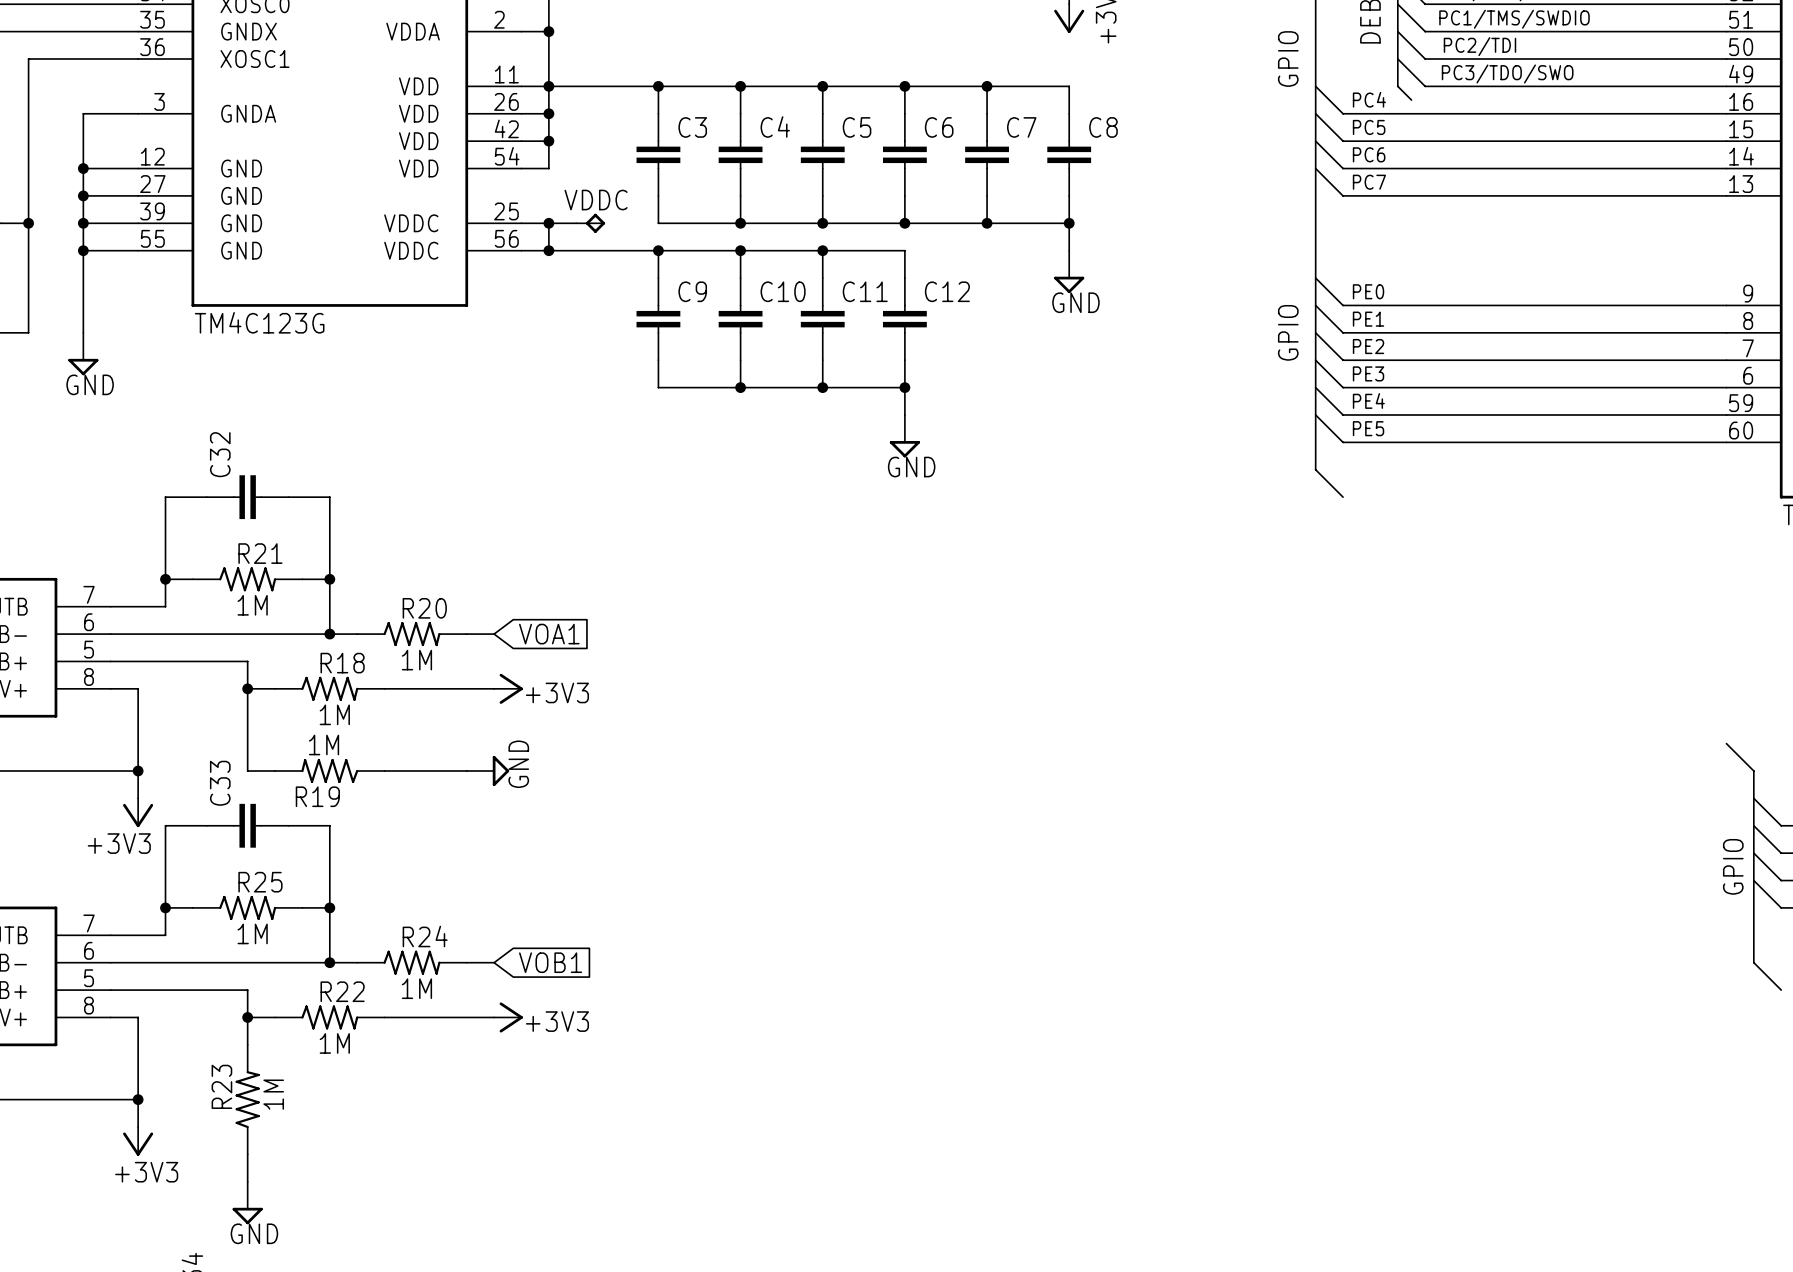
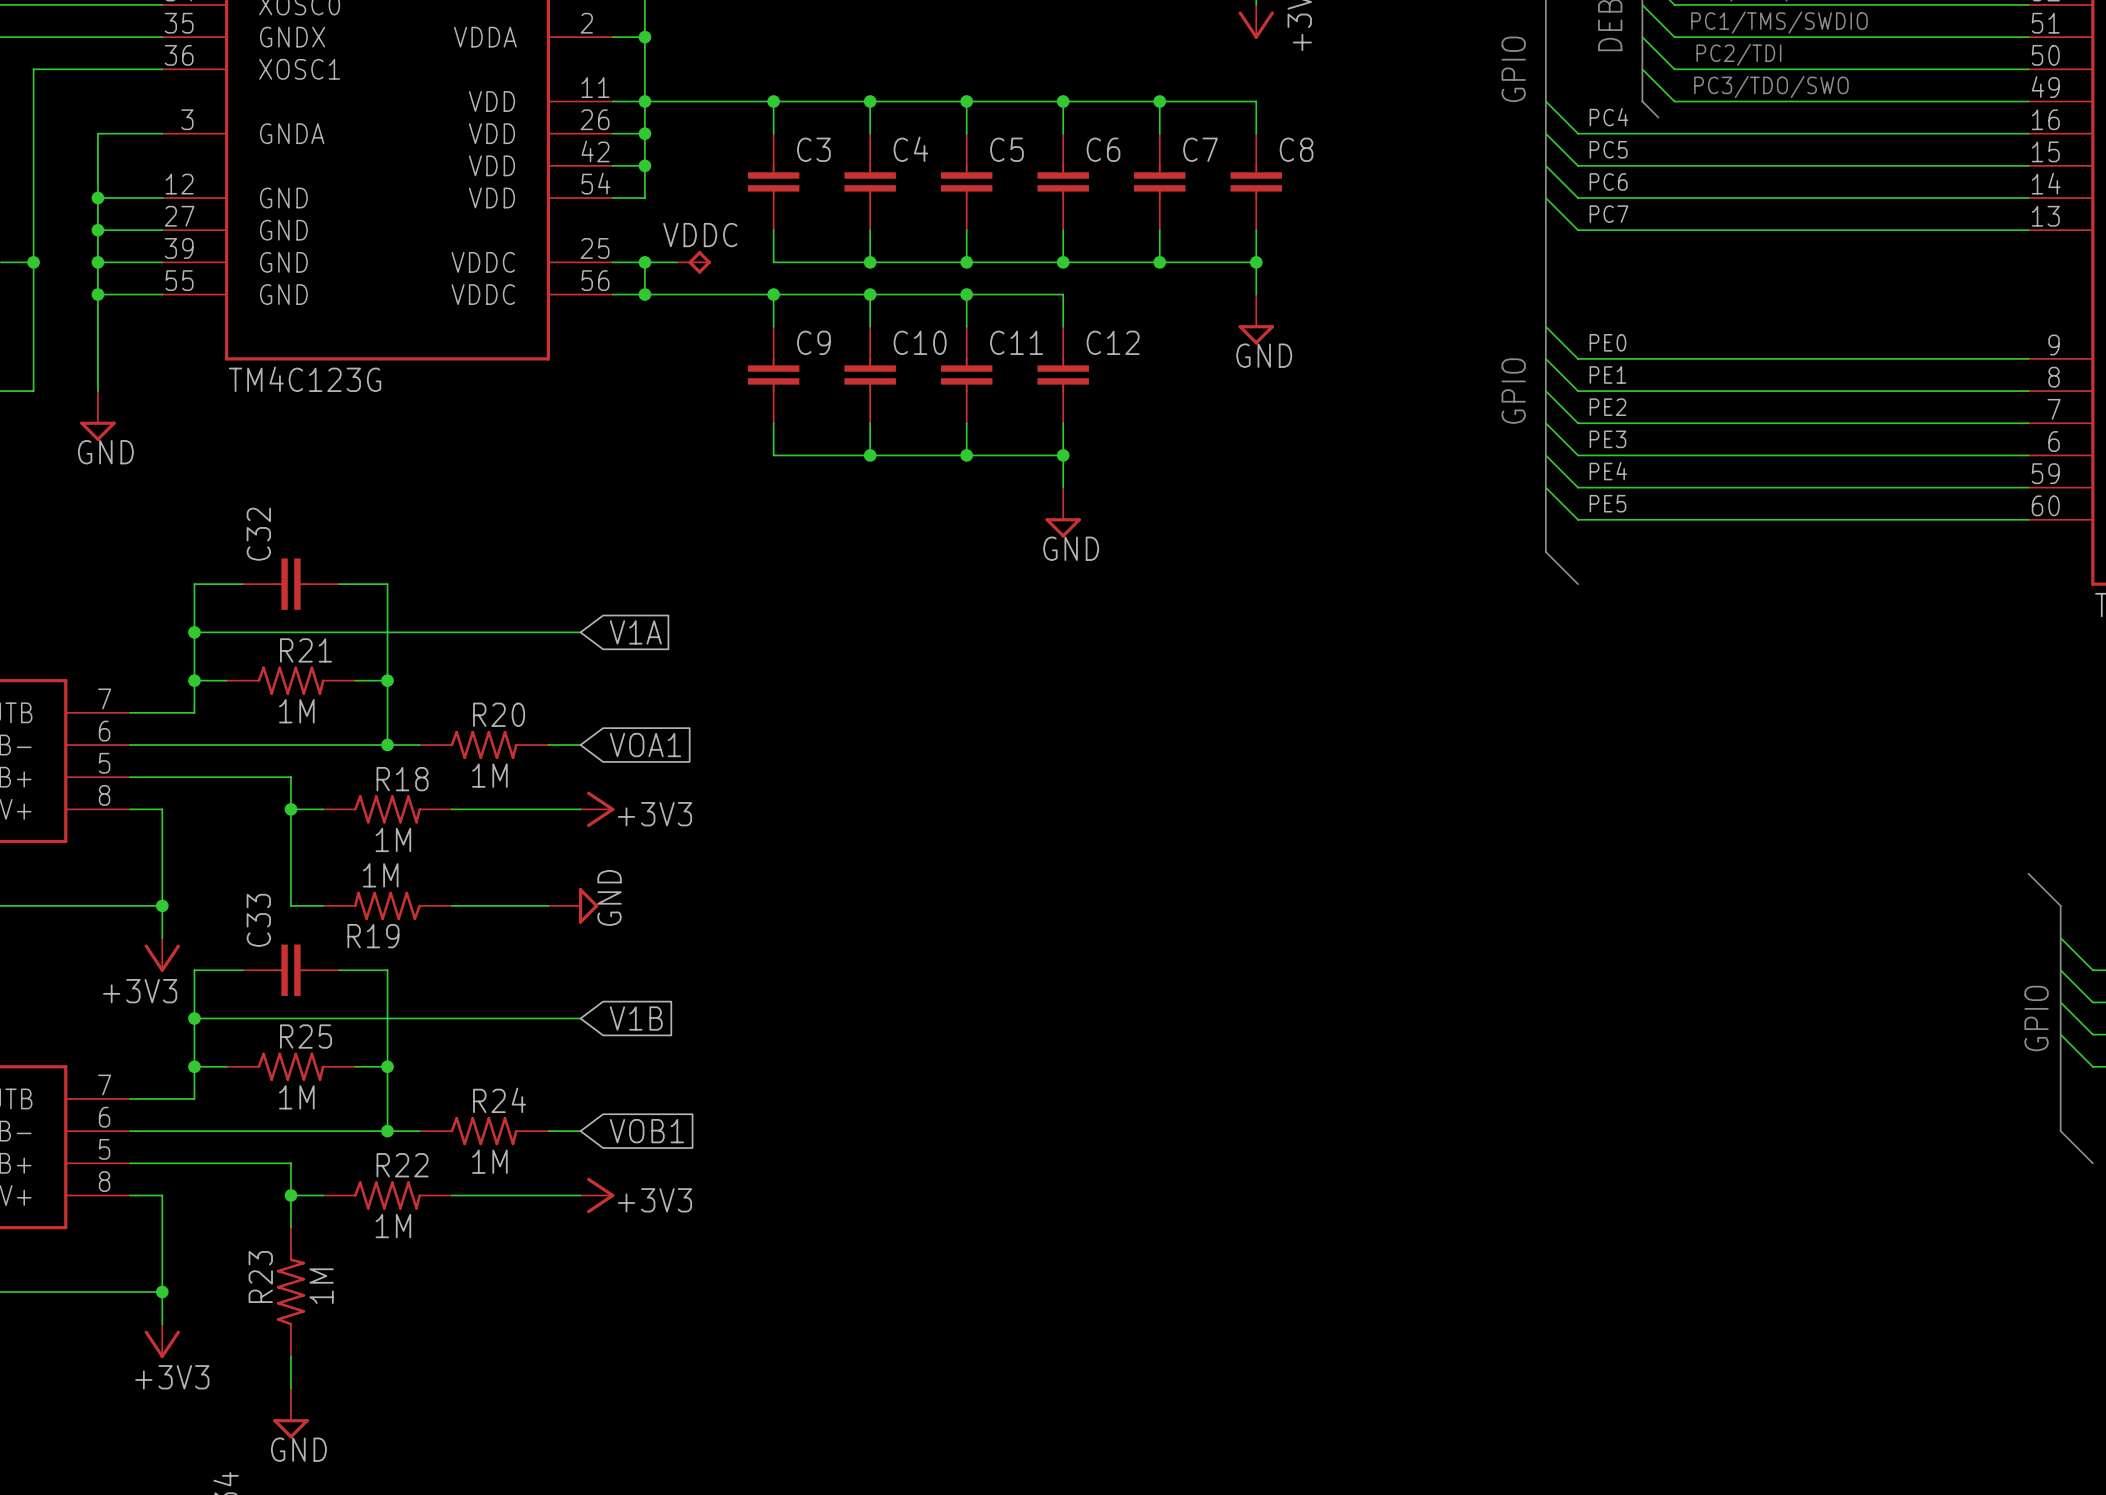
wire: none -> (194, 632) (580, 632)
junction: none -> (194, 632)
global label: none -> V1A (635, 632)
wire: none -> (194, 1018) (580, 1018)
junction: none -> (194, 1018)
global label: none -> V1B (636, 1018)

